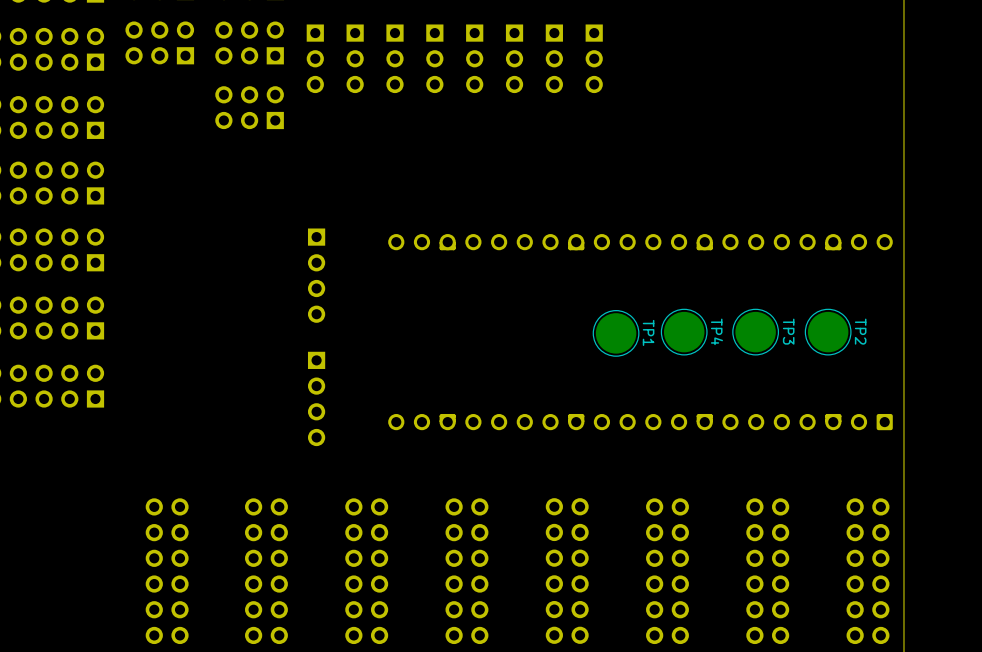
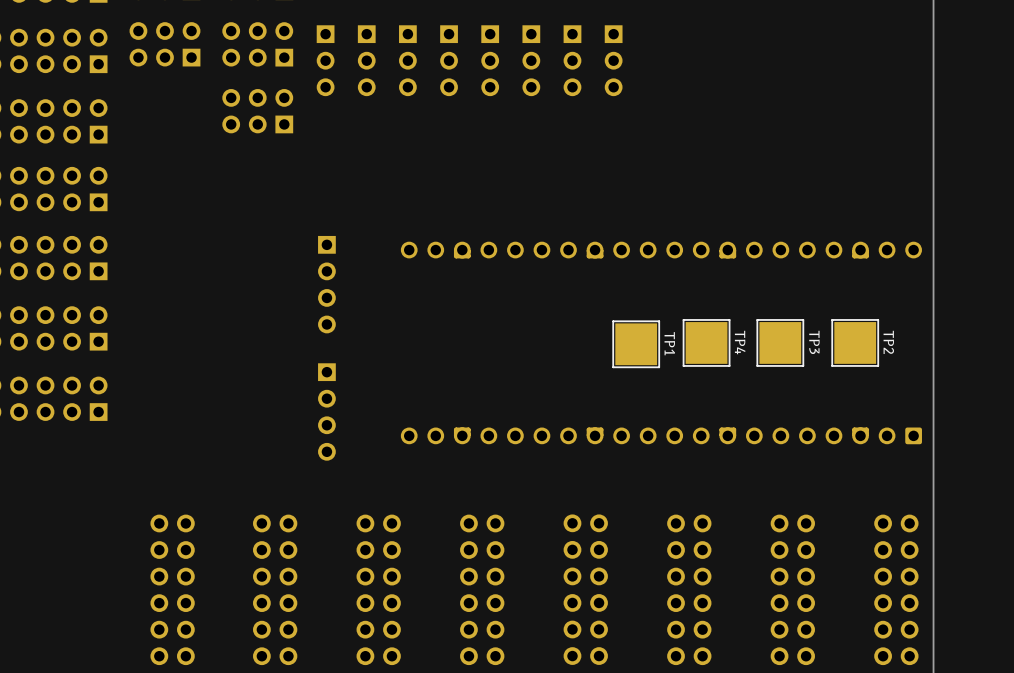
TP4 footprint: [660, 308, 708, 356] -> [682, 319, 731, 367]
TP3 footprint: [732, 308, 780, 356] -> [756, 319, 804, 367]
TP2 footprint: [804, 308, 852, 356] -> [831, 319, 879, 367]
TP1 footprint: [592, 310, 640, 357] -> [612, 320, 660, 368]

